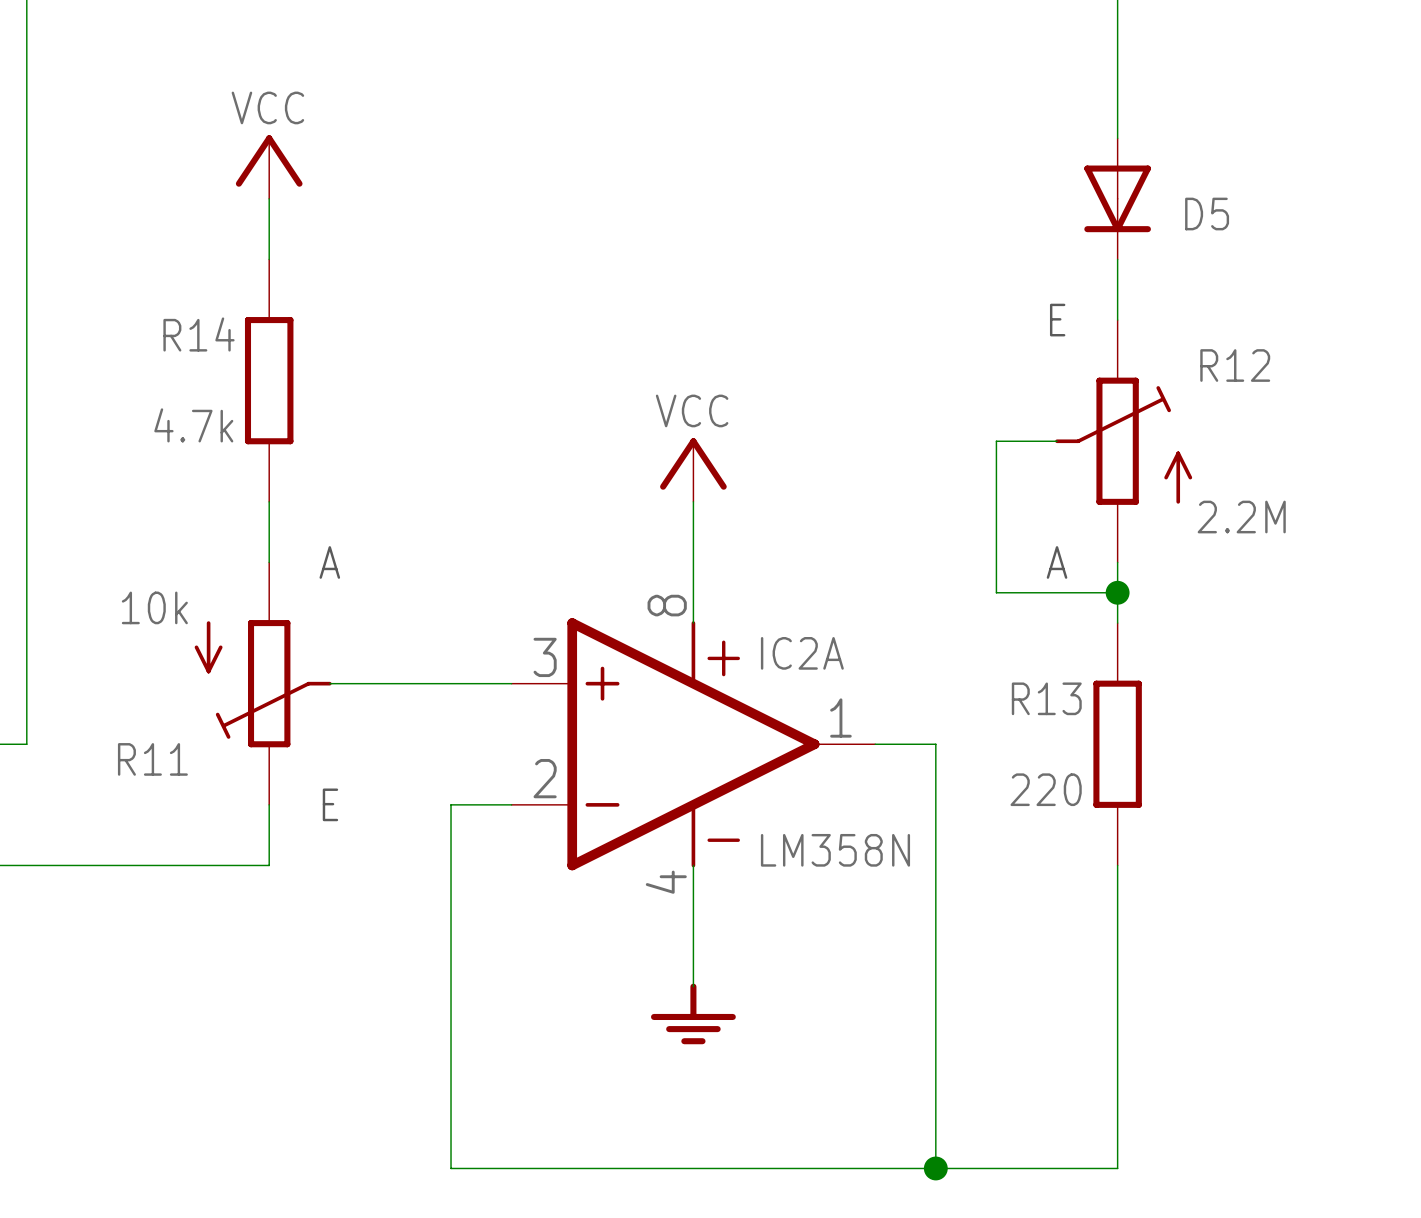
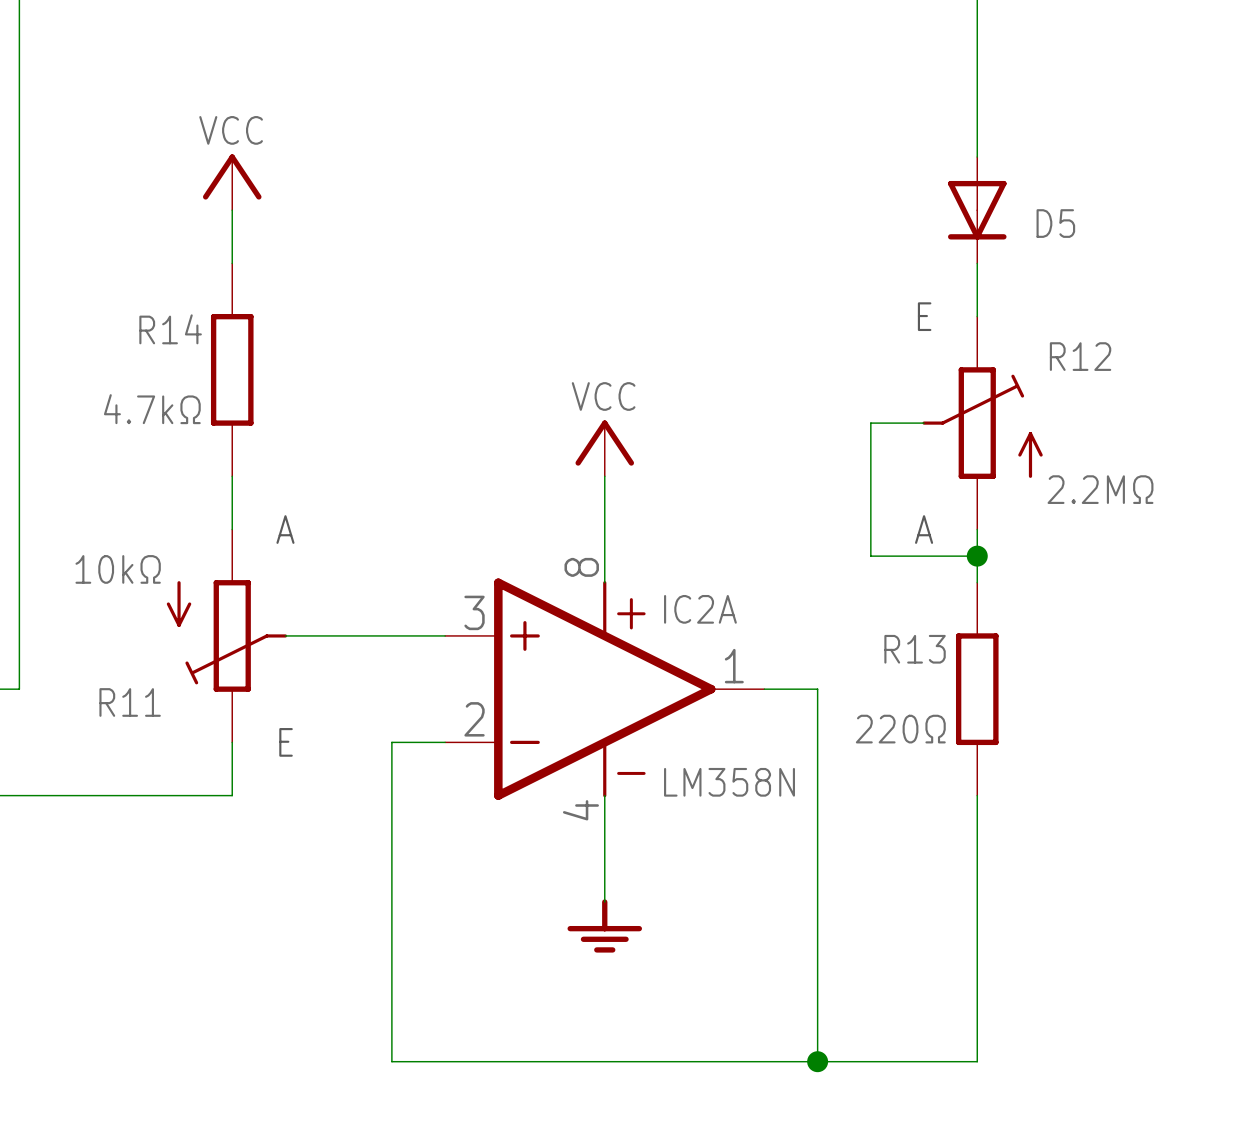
R14 value: 4.7k (193, 425) -> 4.7kΩ (152, 409)
R12 value: 2.2M (1241, 517) -> 2.2MΩ (1100, 489)
R11 value: 10k (154, 607) -> 10kΩ (118, 569)
R13 value: 220 (1046, 789) -> 220Ω (900, 729)

